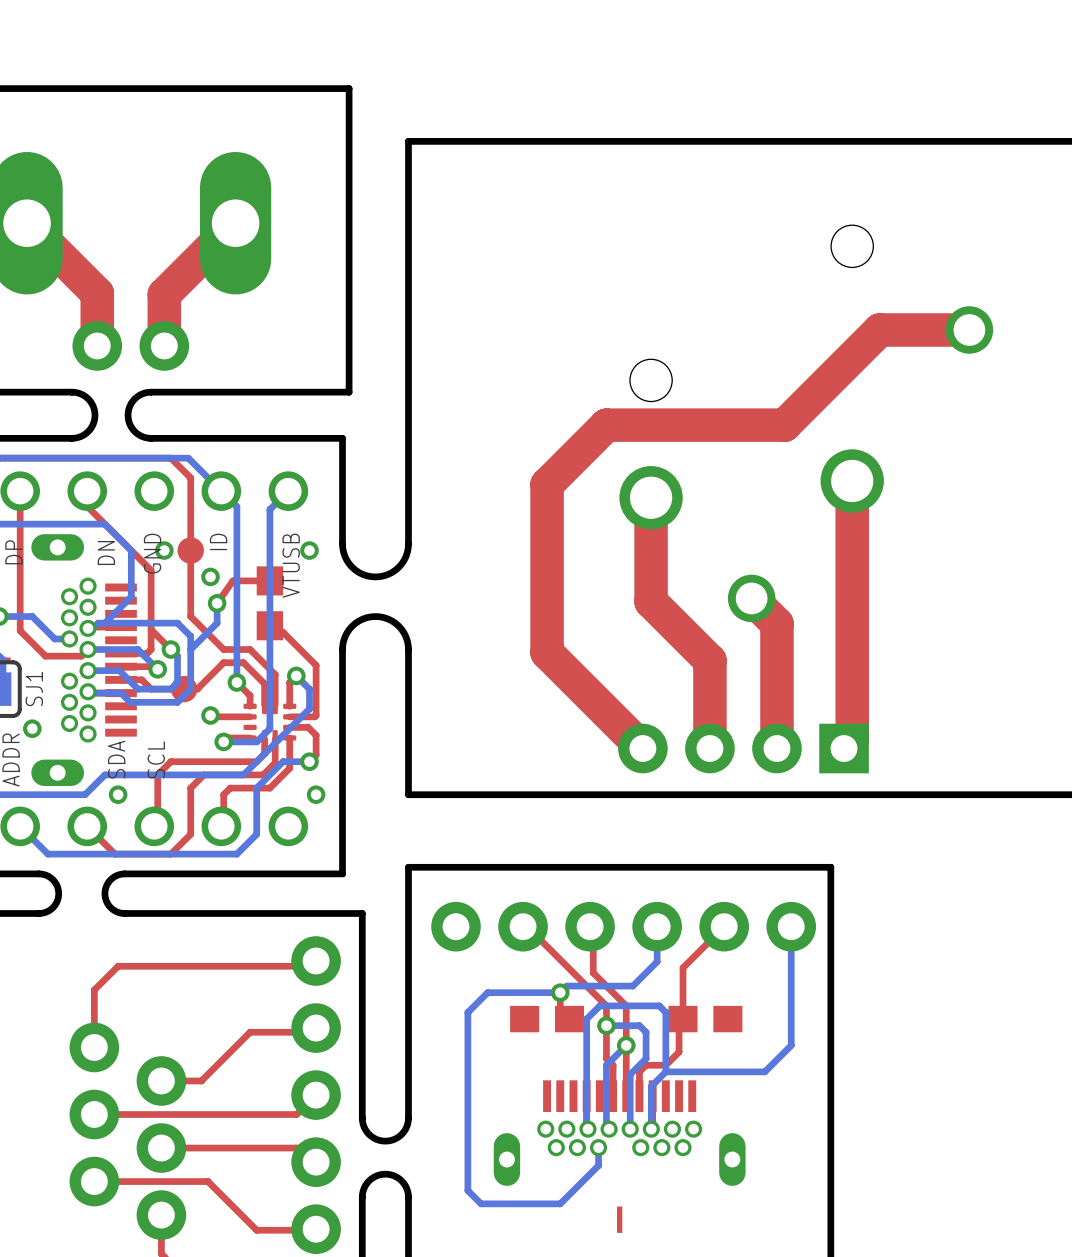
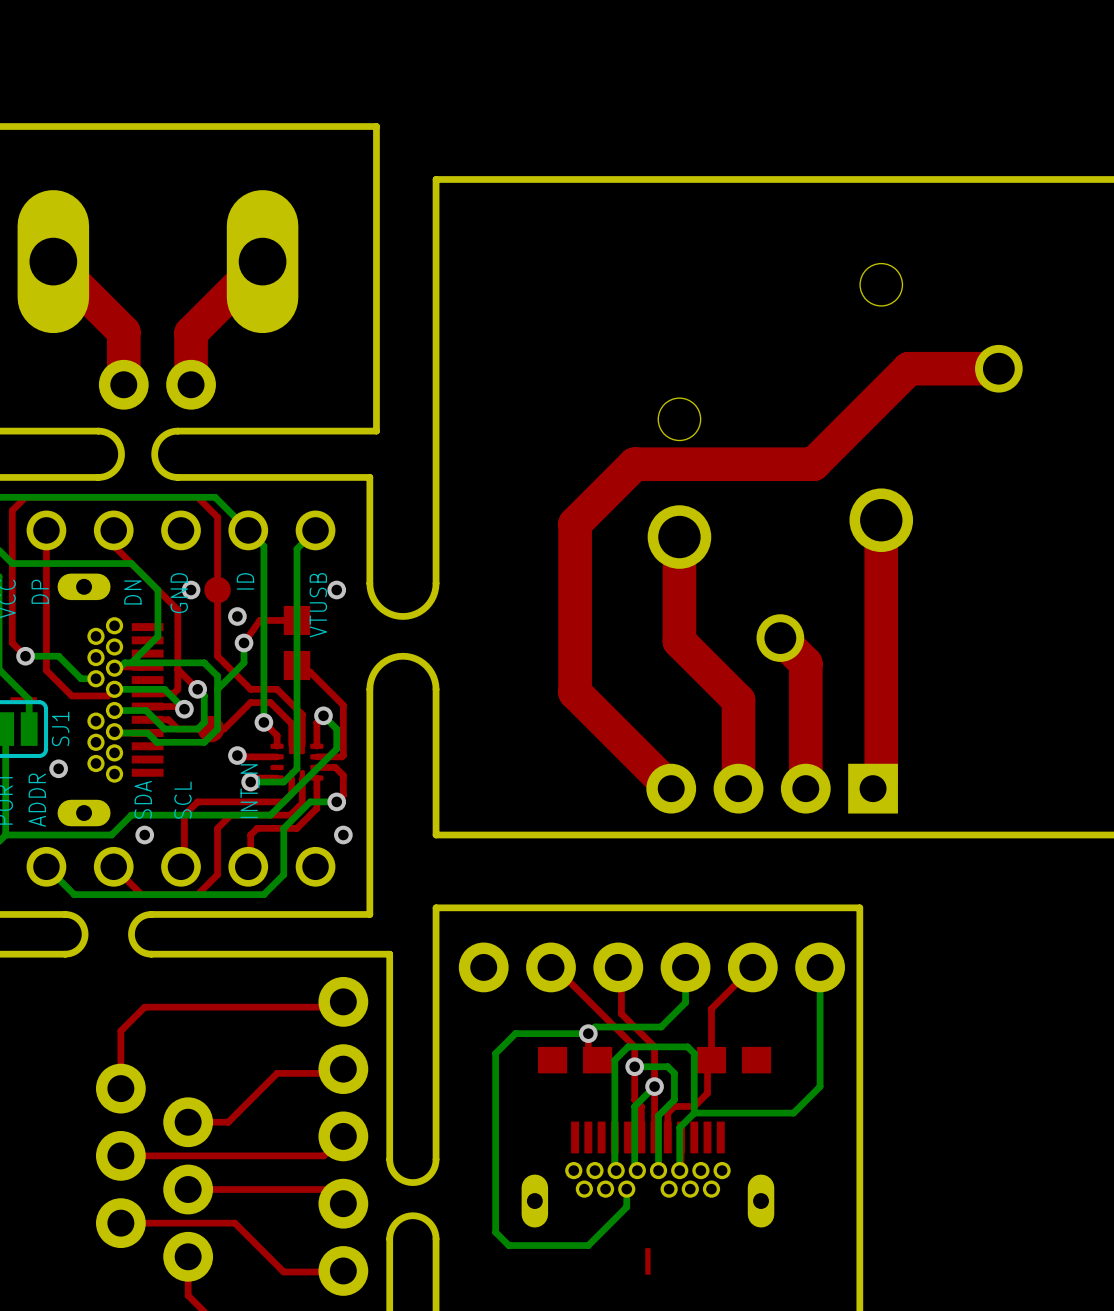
text: none -> INT_N (249, 791)

